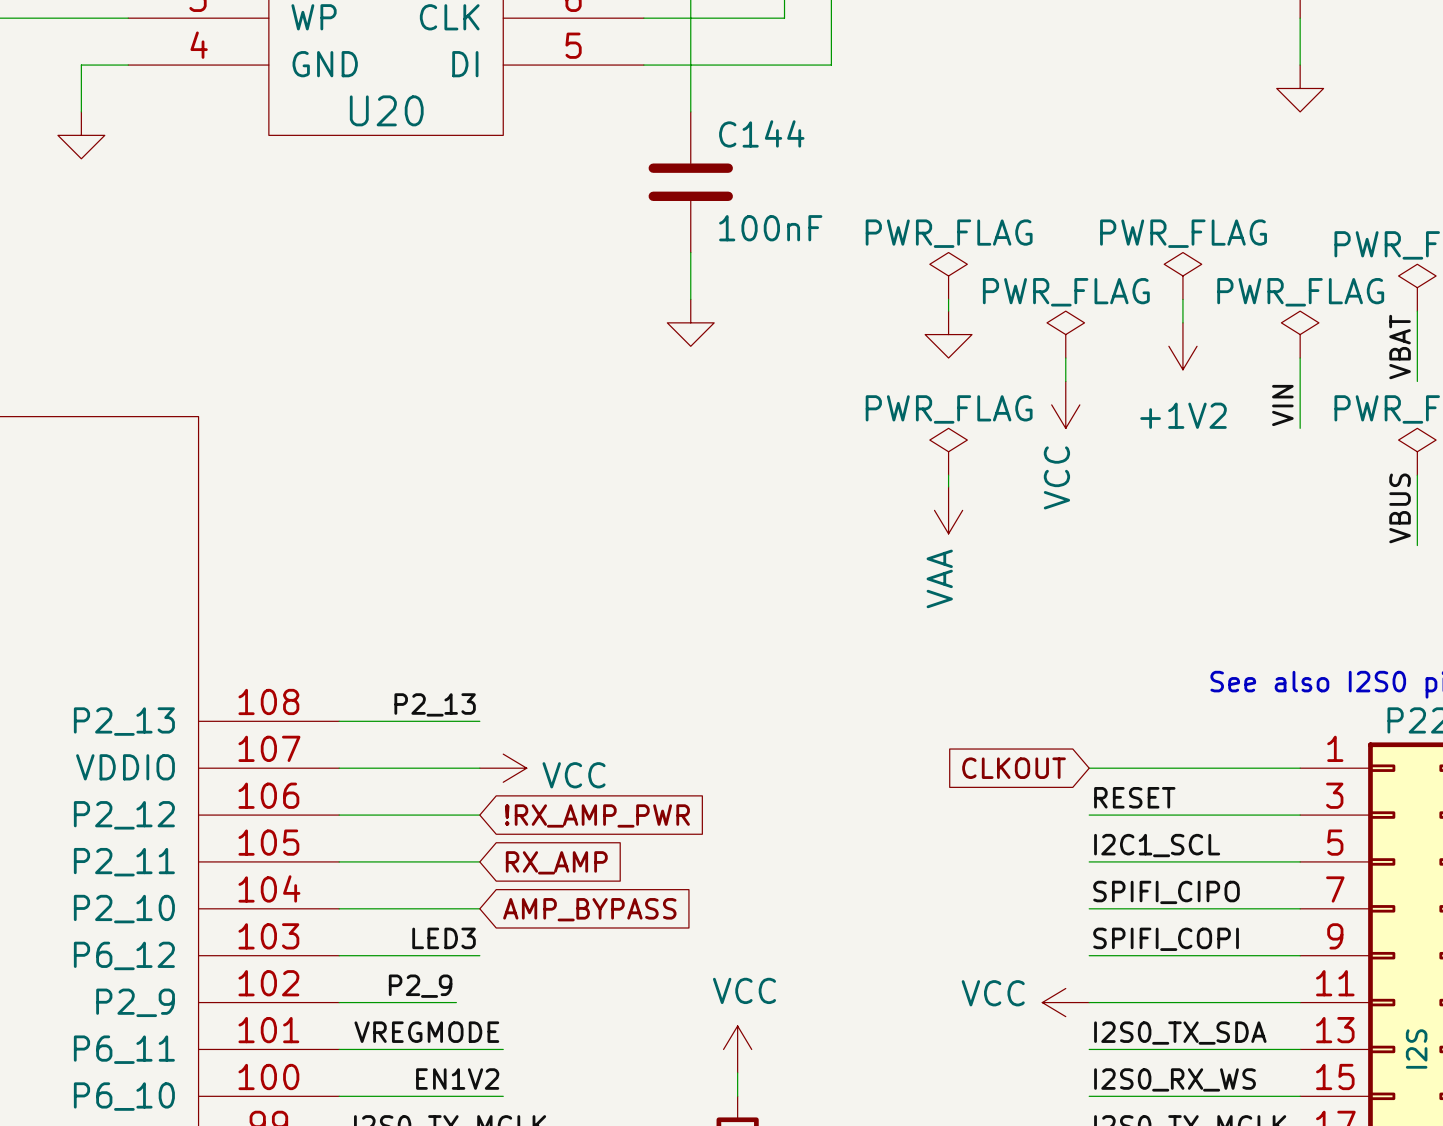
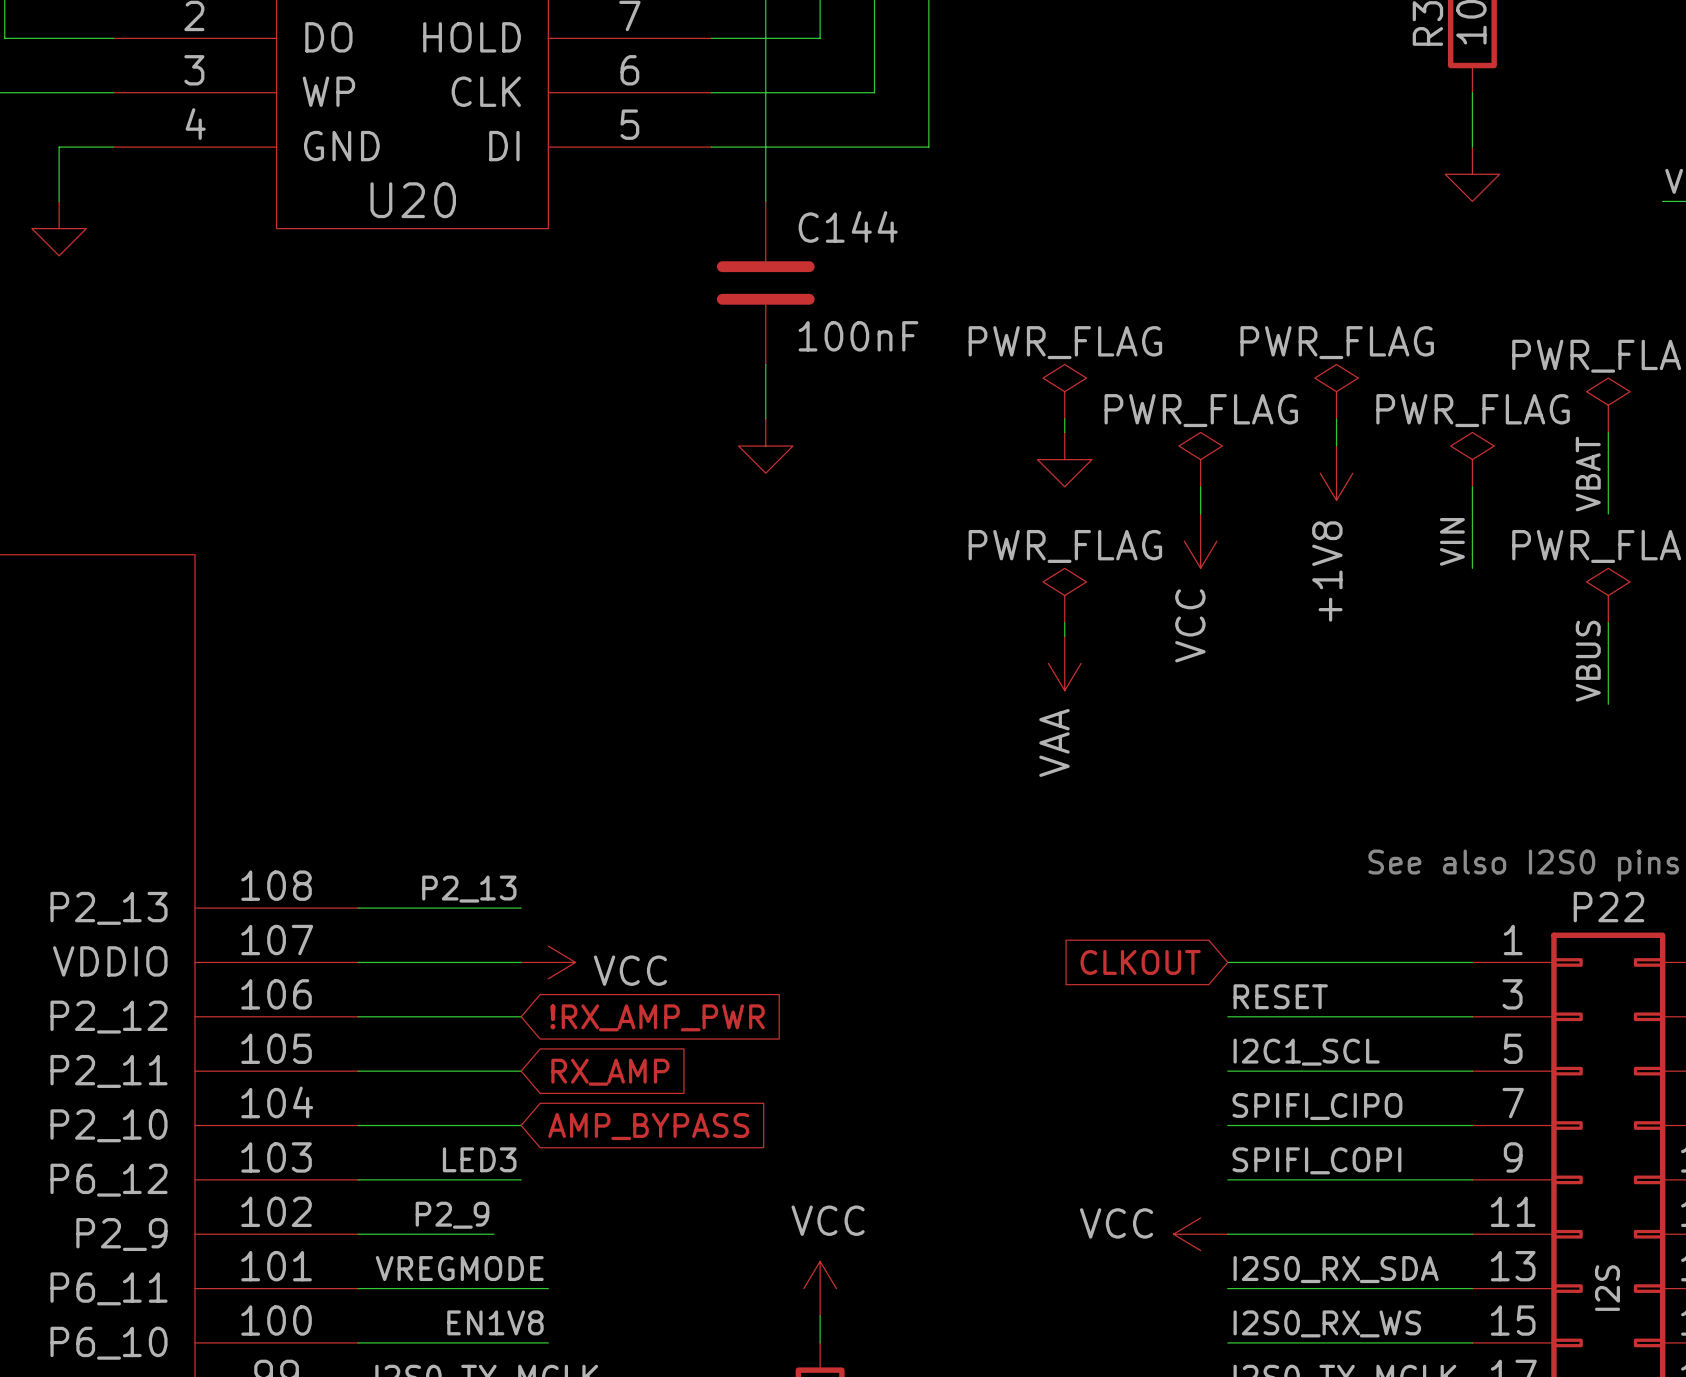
power symbol: +1V2 (1182, 346) -> +1V8 (1336, 473)
label: I2S0_TX_SDA (1180, 1033) -> I2S0_RX_SDA (1336, 1269)
label: EN1V2 (457, 1079) -> EN1V8 (495, 1322)

